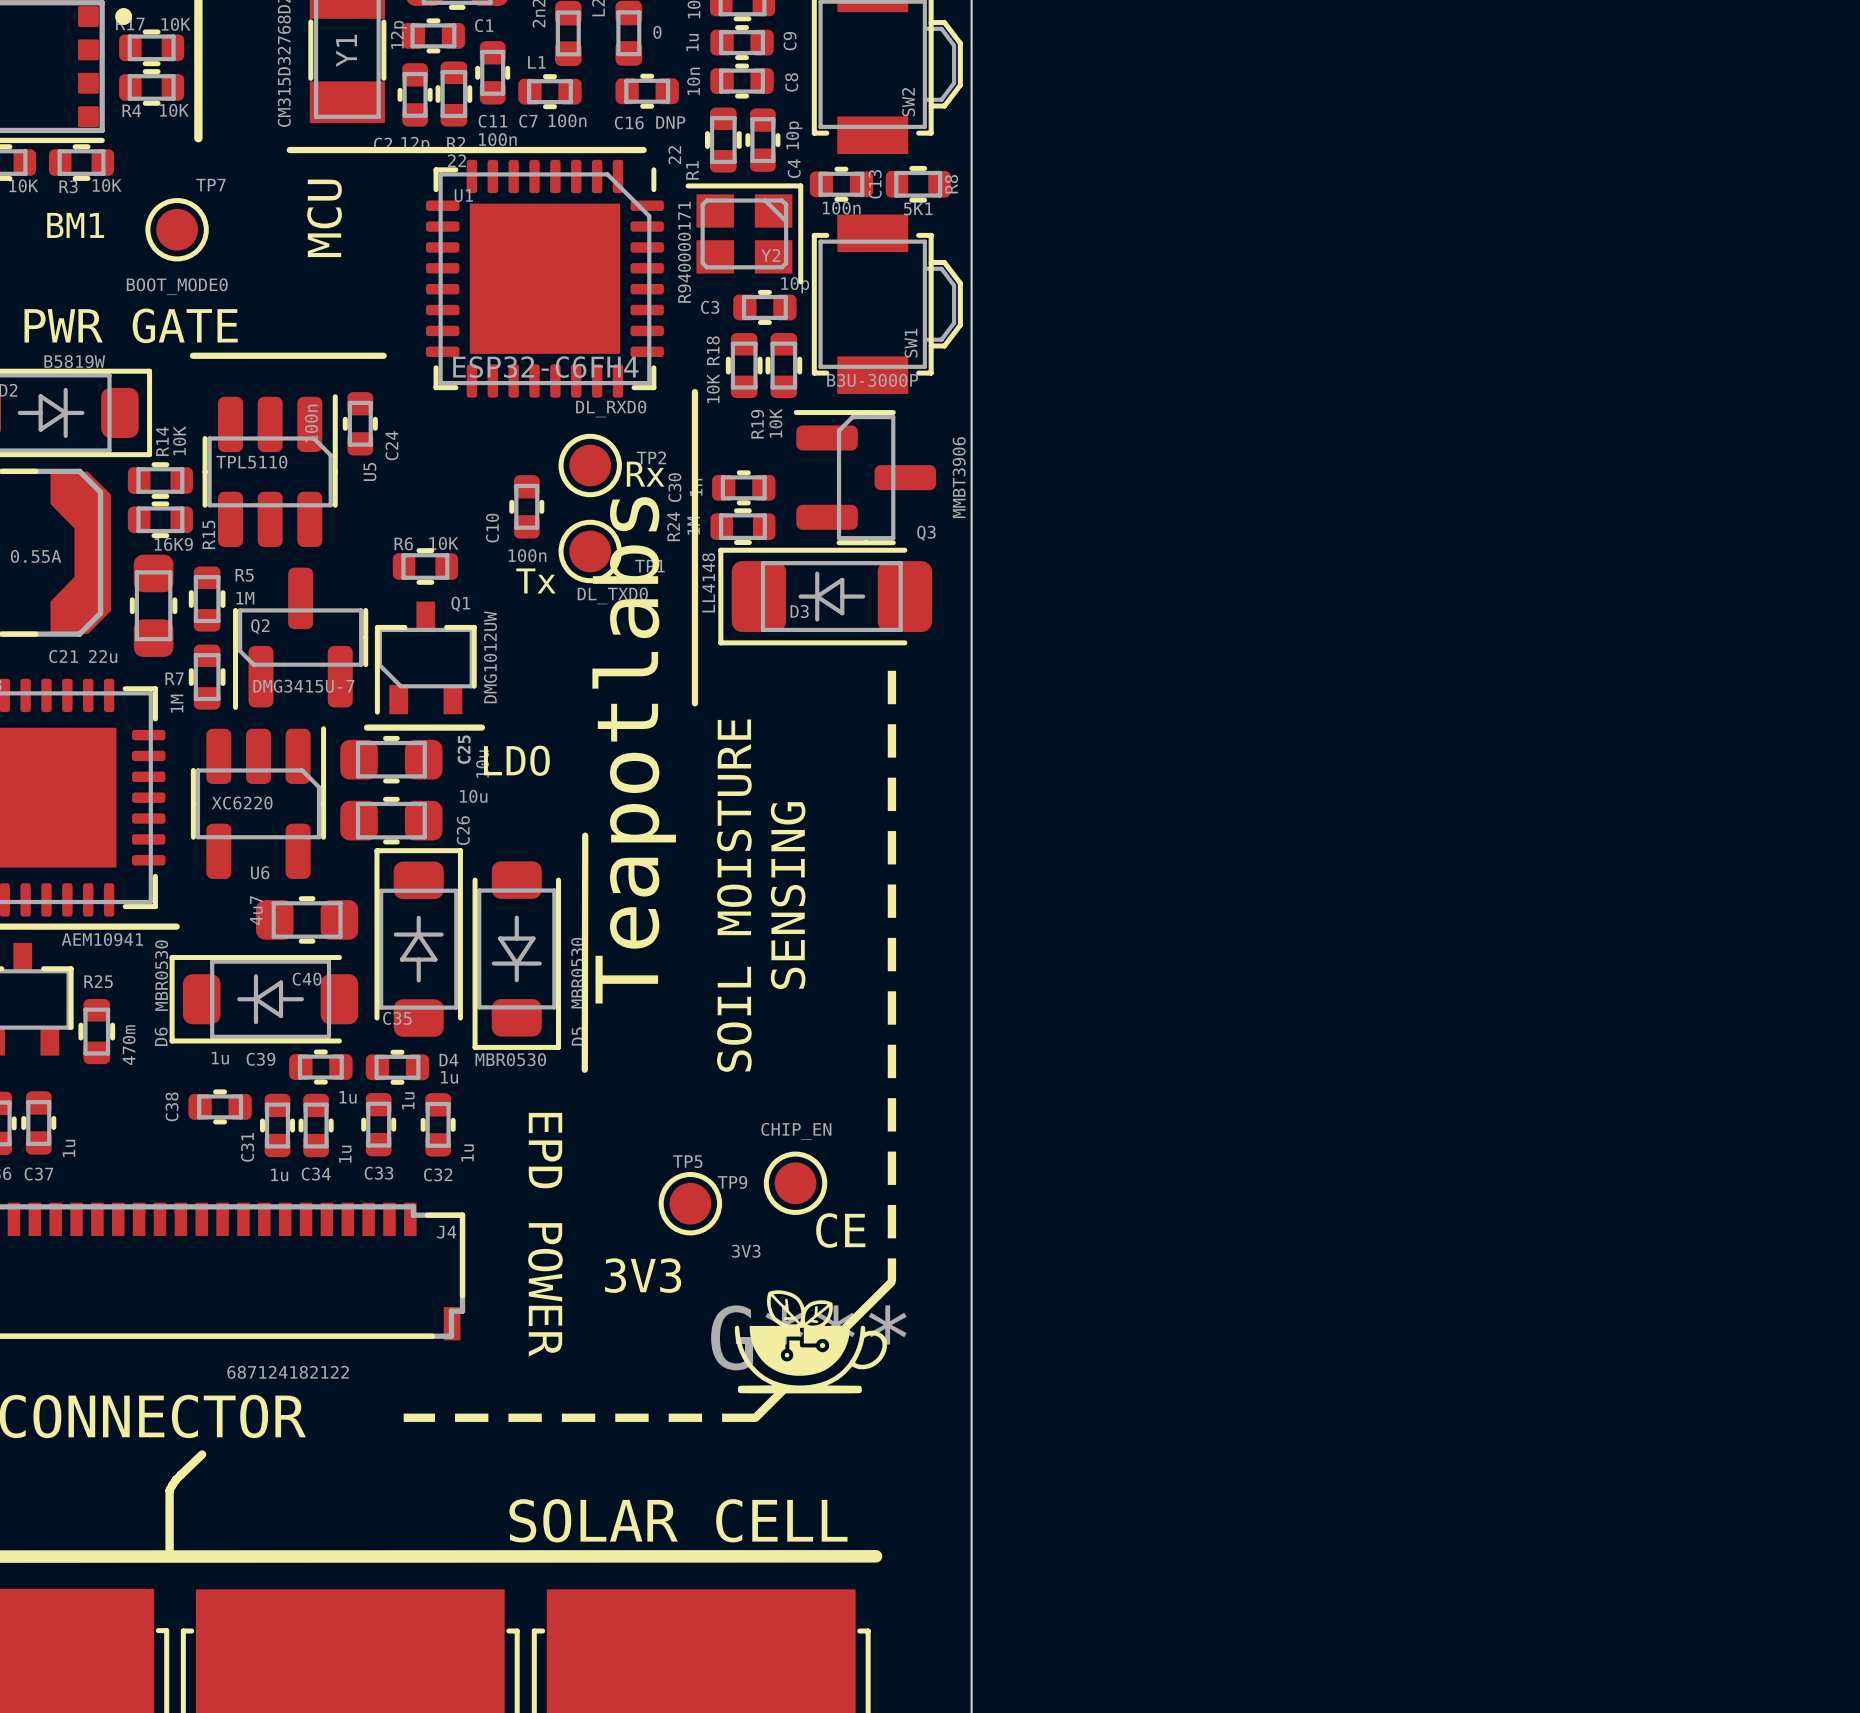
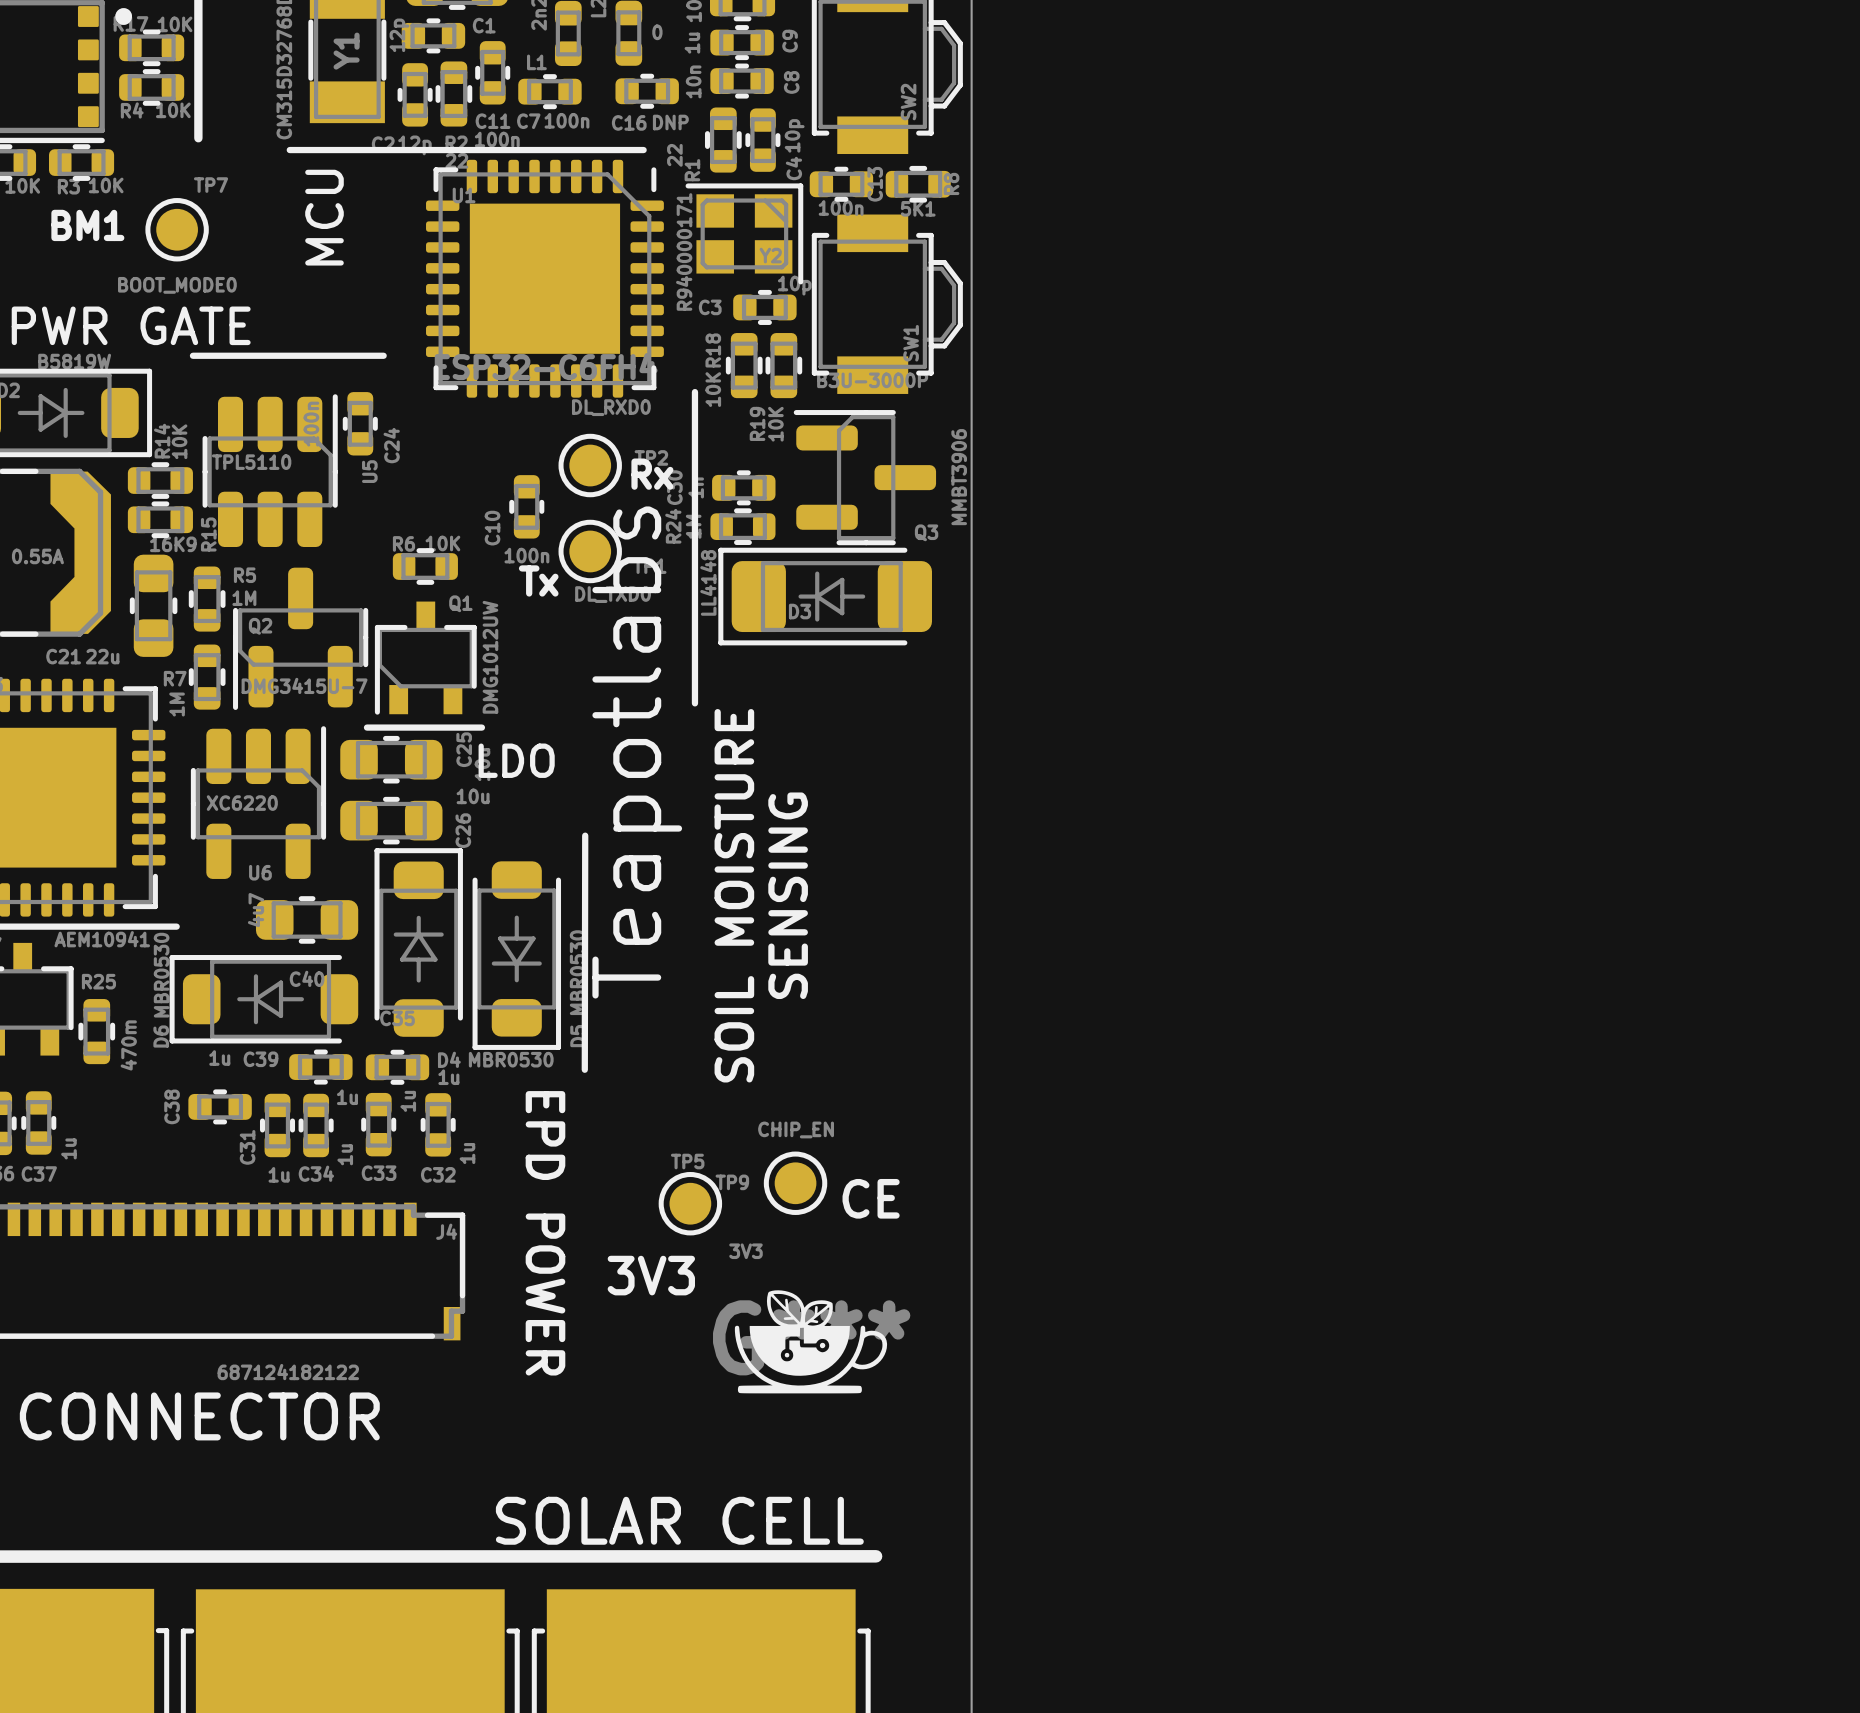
line: (891, 670) (891, 1281) -> none
text position: CE (840, 1230) -> CE (871, 1198)
line: (891, 1282) (842, 1330) -> none
line: (783, 1389) (755, 1417) (403, 1417) -> none
line: (202, 1454) (175, 1479) (169, 1490) (169, 1556) -> none

